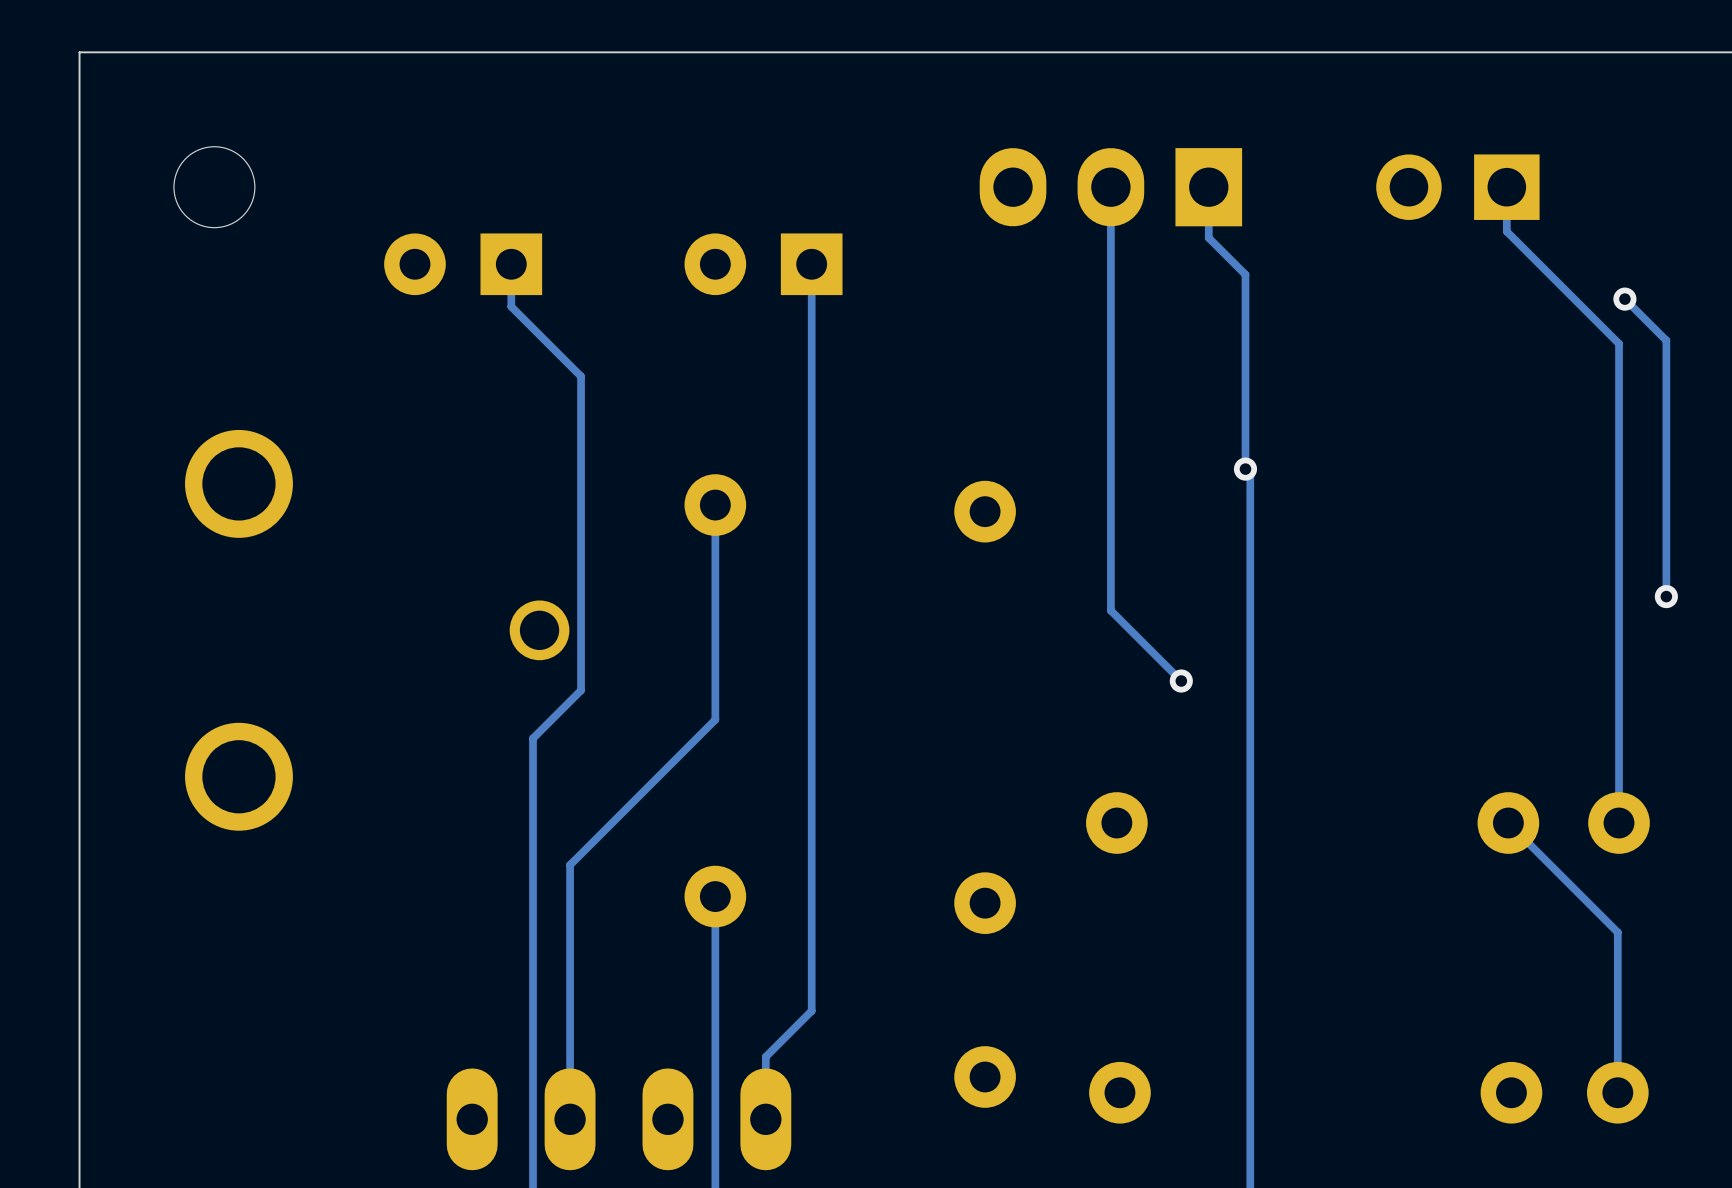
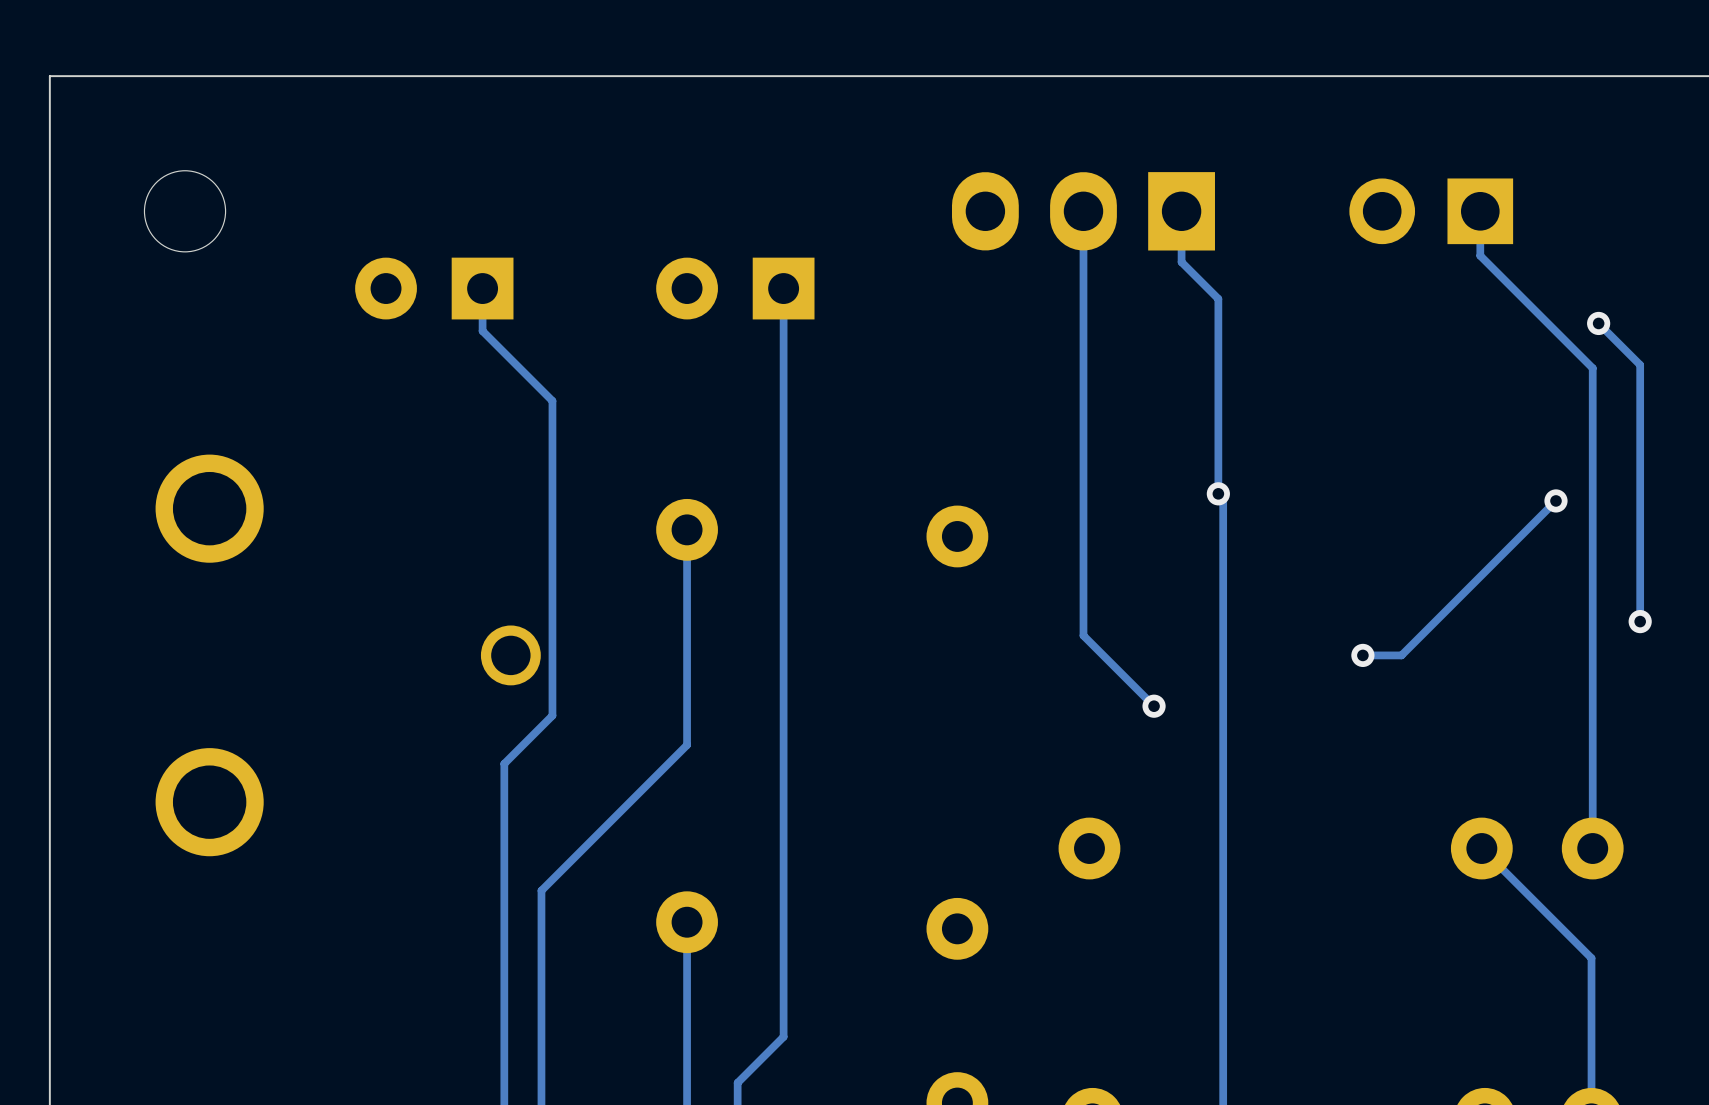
track: none -> (1555, 500) (1401, 655) (1362, 655)
via: none -> (1555, 500)
via: none -> (1362, 655)

